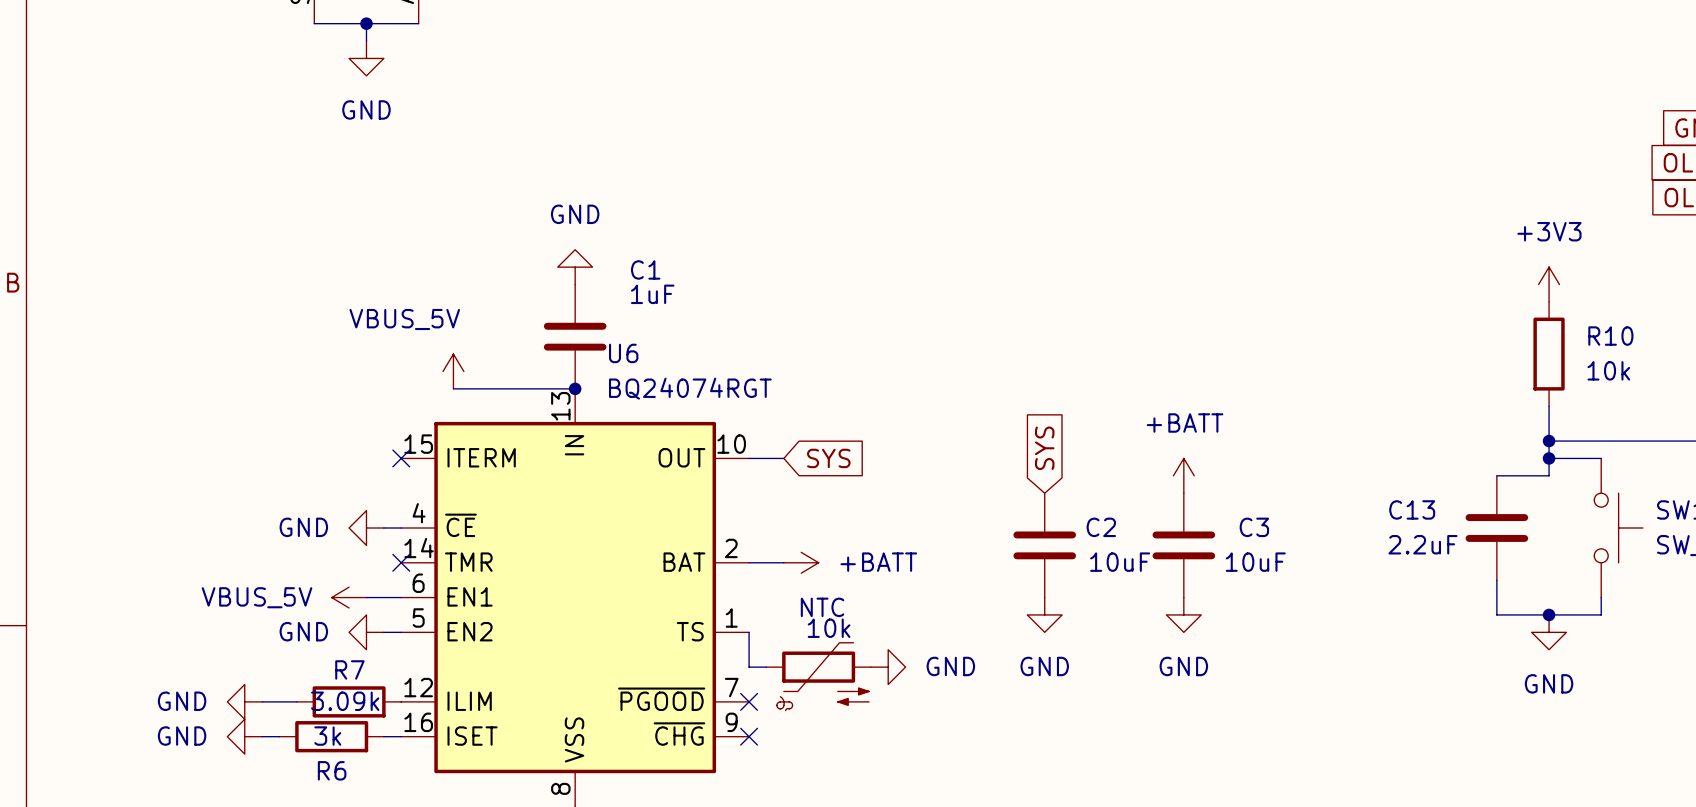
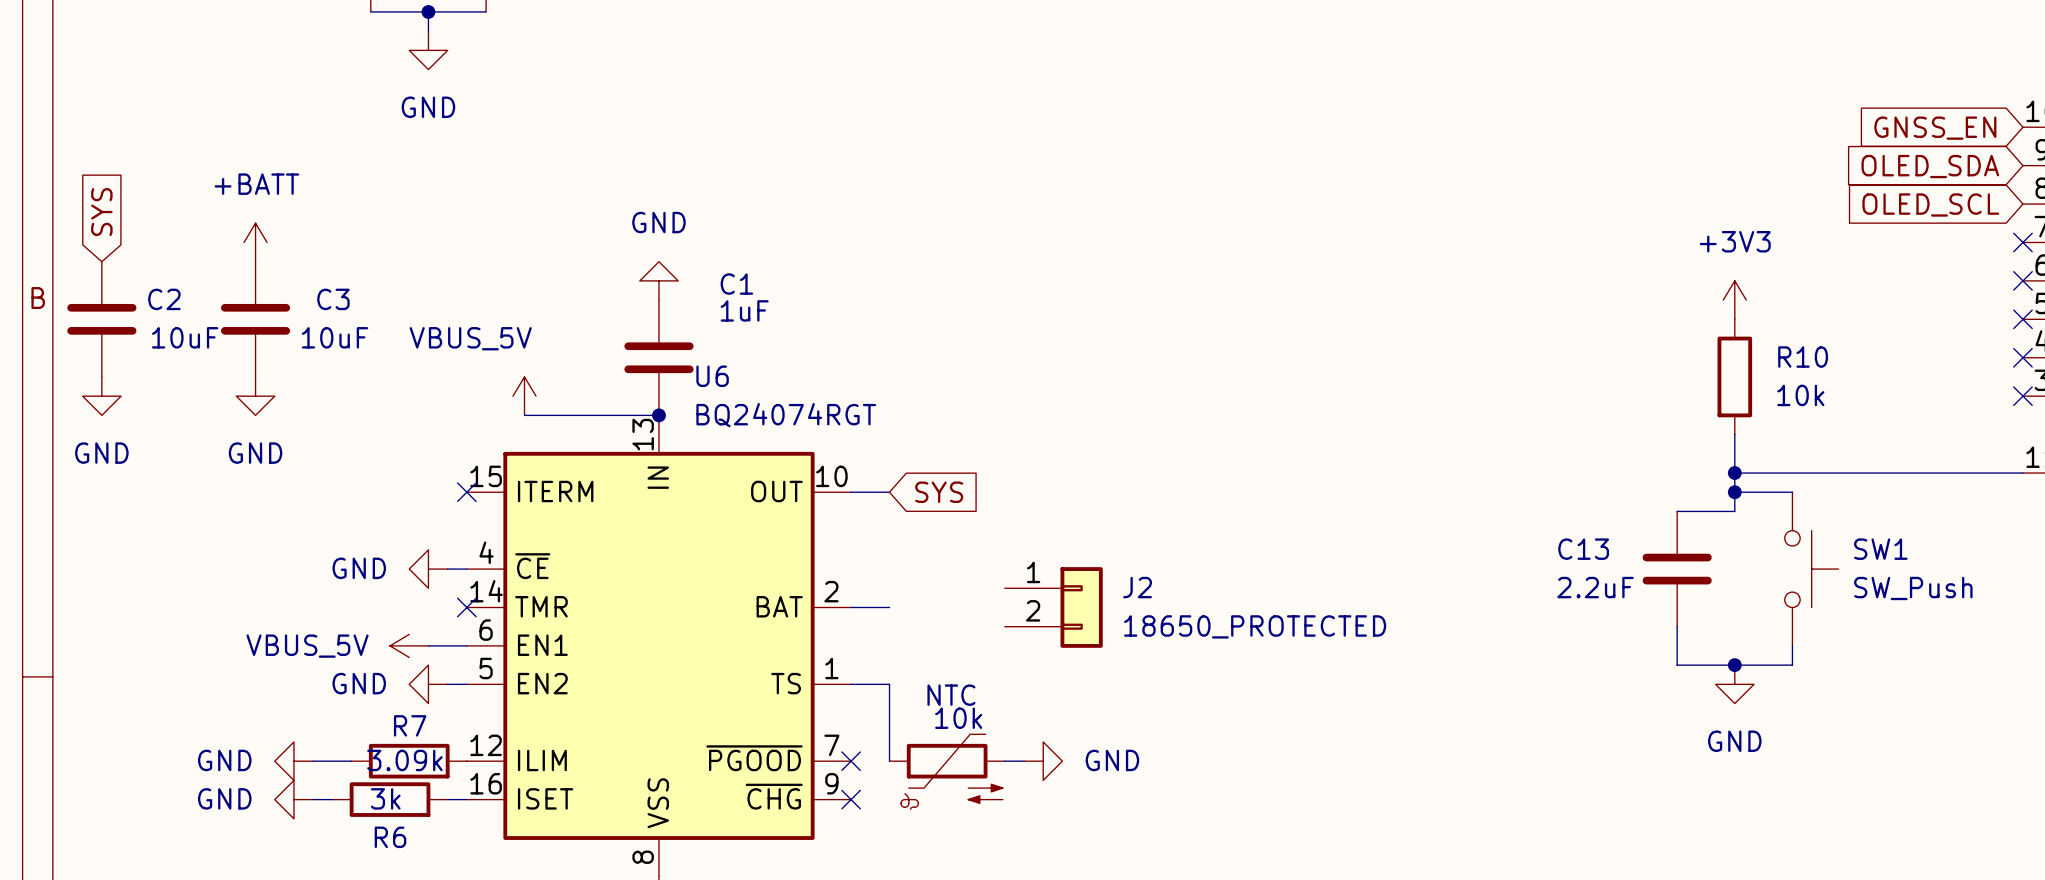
global label: none -> SYS (101, 212)
power symbol: none -> +BATT (255, 242)
power symbol: none -> GND (101, 396)
power symbol: none -> GND (255, 396)
global label: SYS (1044, 448) -> none
power symbol: +BATT (1183, 475) -> none
C2 position: (1044, 545) -> (101, 319)
C3 position: (1183, 545) -> (255, 319)
power symbol: +BATT (801, 562) -> none
J2: none -> 18650_PROTECTED (1053, 607)
power symbol: GND (1044, 614) -> none
power symbol: GND (1183, 614) -> none
wire: (749, 632) (749, 667) (766, 667) -> (851, 684) (889, 684) (889, 761)
power symbol position: GND (888, 667) -> GND (1043, 761)
NTC position: (818, 676) -> (947, 771)
wire: none -> (1004, 761) (1023, 761)

